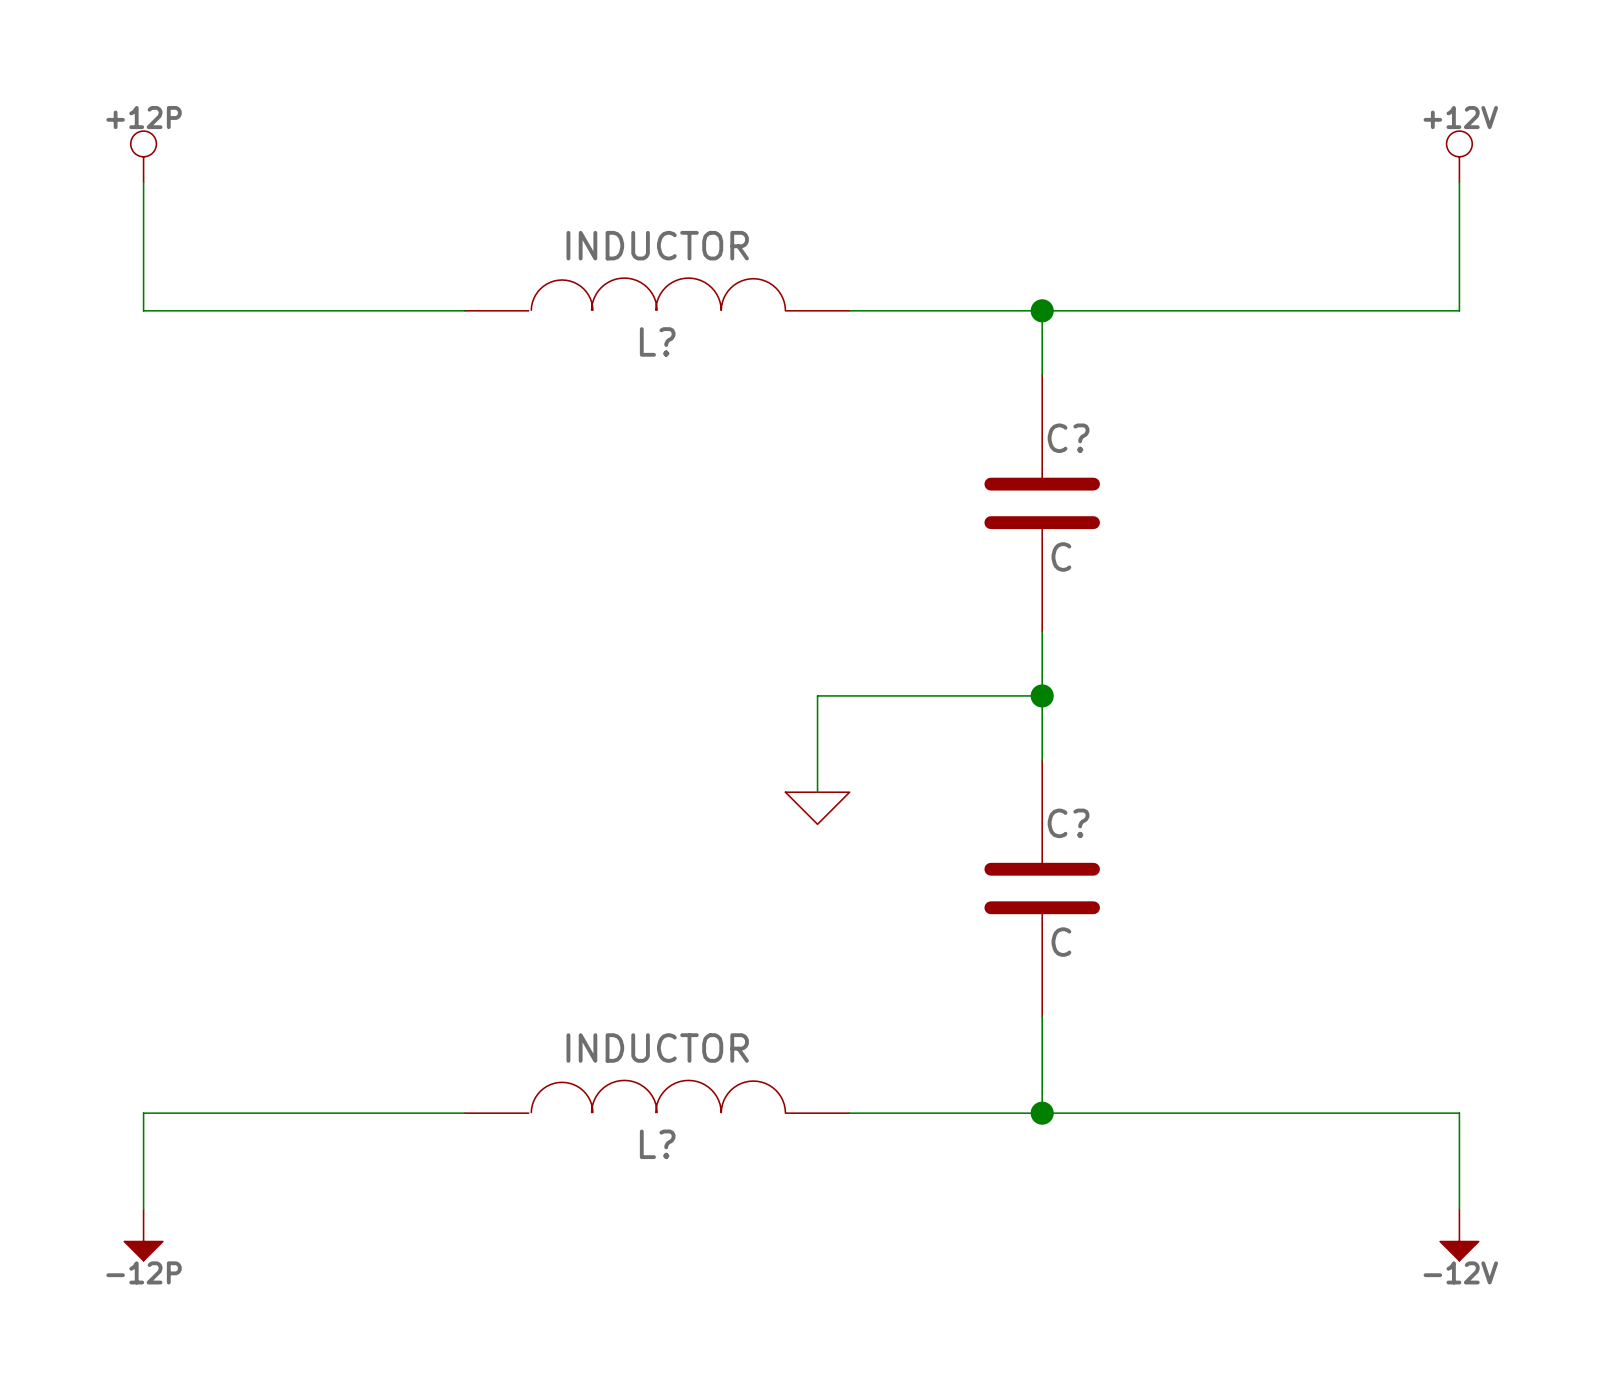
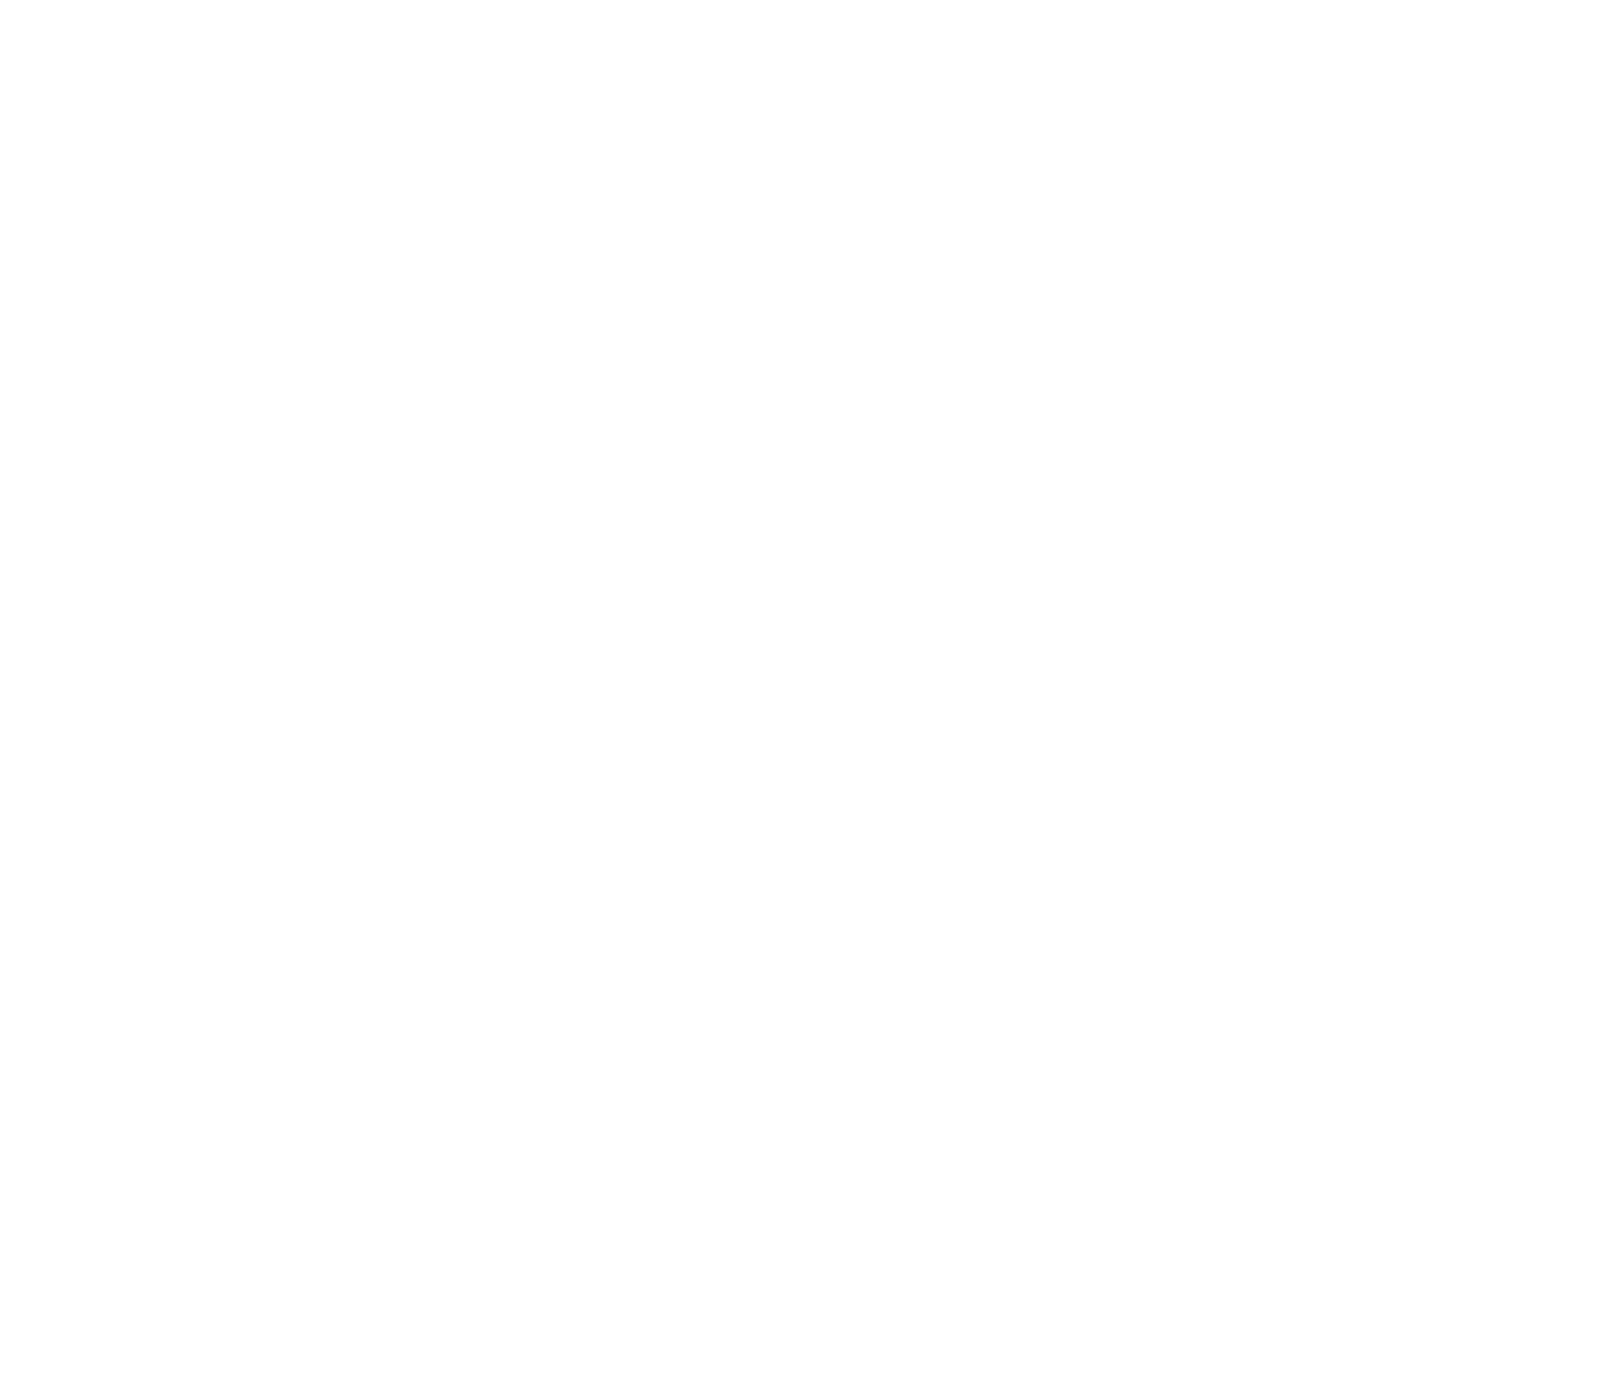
power symbol: +12P (143, 156) -> none
power symbol: +12V (1459, 156) -> none
wire: (143, 182) (143, 310) (464, 310) -> none
wire: (1459, 182) (1459, 310) (849, 310) -> none
L?: INDUCTOR (657, 294) -> none
wire: (1042, 310) (1042, 375) -> none
junction: (1042, 310) -> none
C?: C (1042, 503) -> none
wire: (1042, 631) (1042, 760) -> none
wire: (1042, 695) (817, 695) (817, 792) -> none
junction: (1042, 695) -> none
power symbol: (817, 808) -> none
C?: C (1042, 888) -> none
wire: (1042, 1016) (1042, 1113) -> none
L?: INDUCTOR (657, 1096) -> none
wire: (464, 1113) (143, 1113) (143, 1209) -> none
wire: (849, 1113) (1459, 1113) (1459, 1209) -> none
junction: (1042, 1113) -> none
power symbol: -12P (143, 1235) -> none
power symbol: -12V (1459, 1235) -> none

